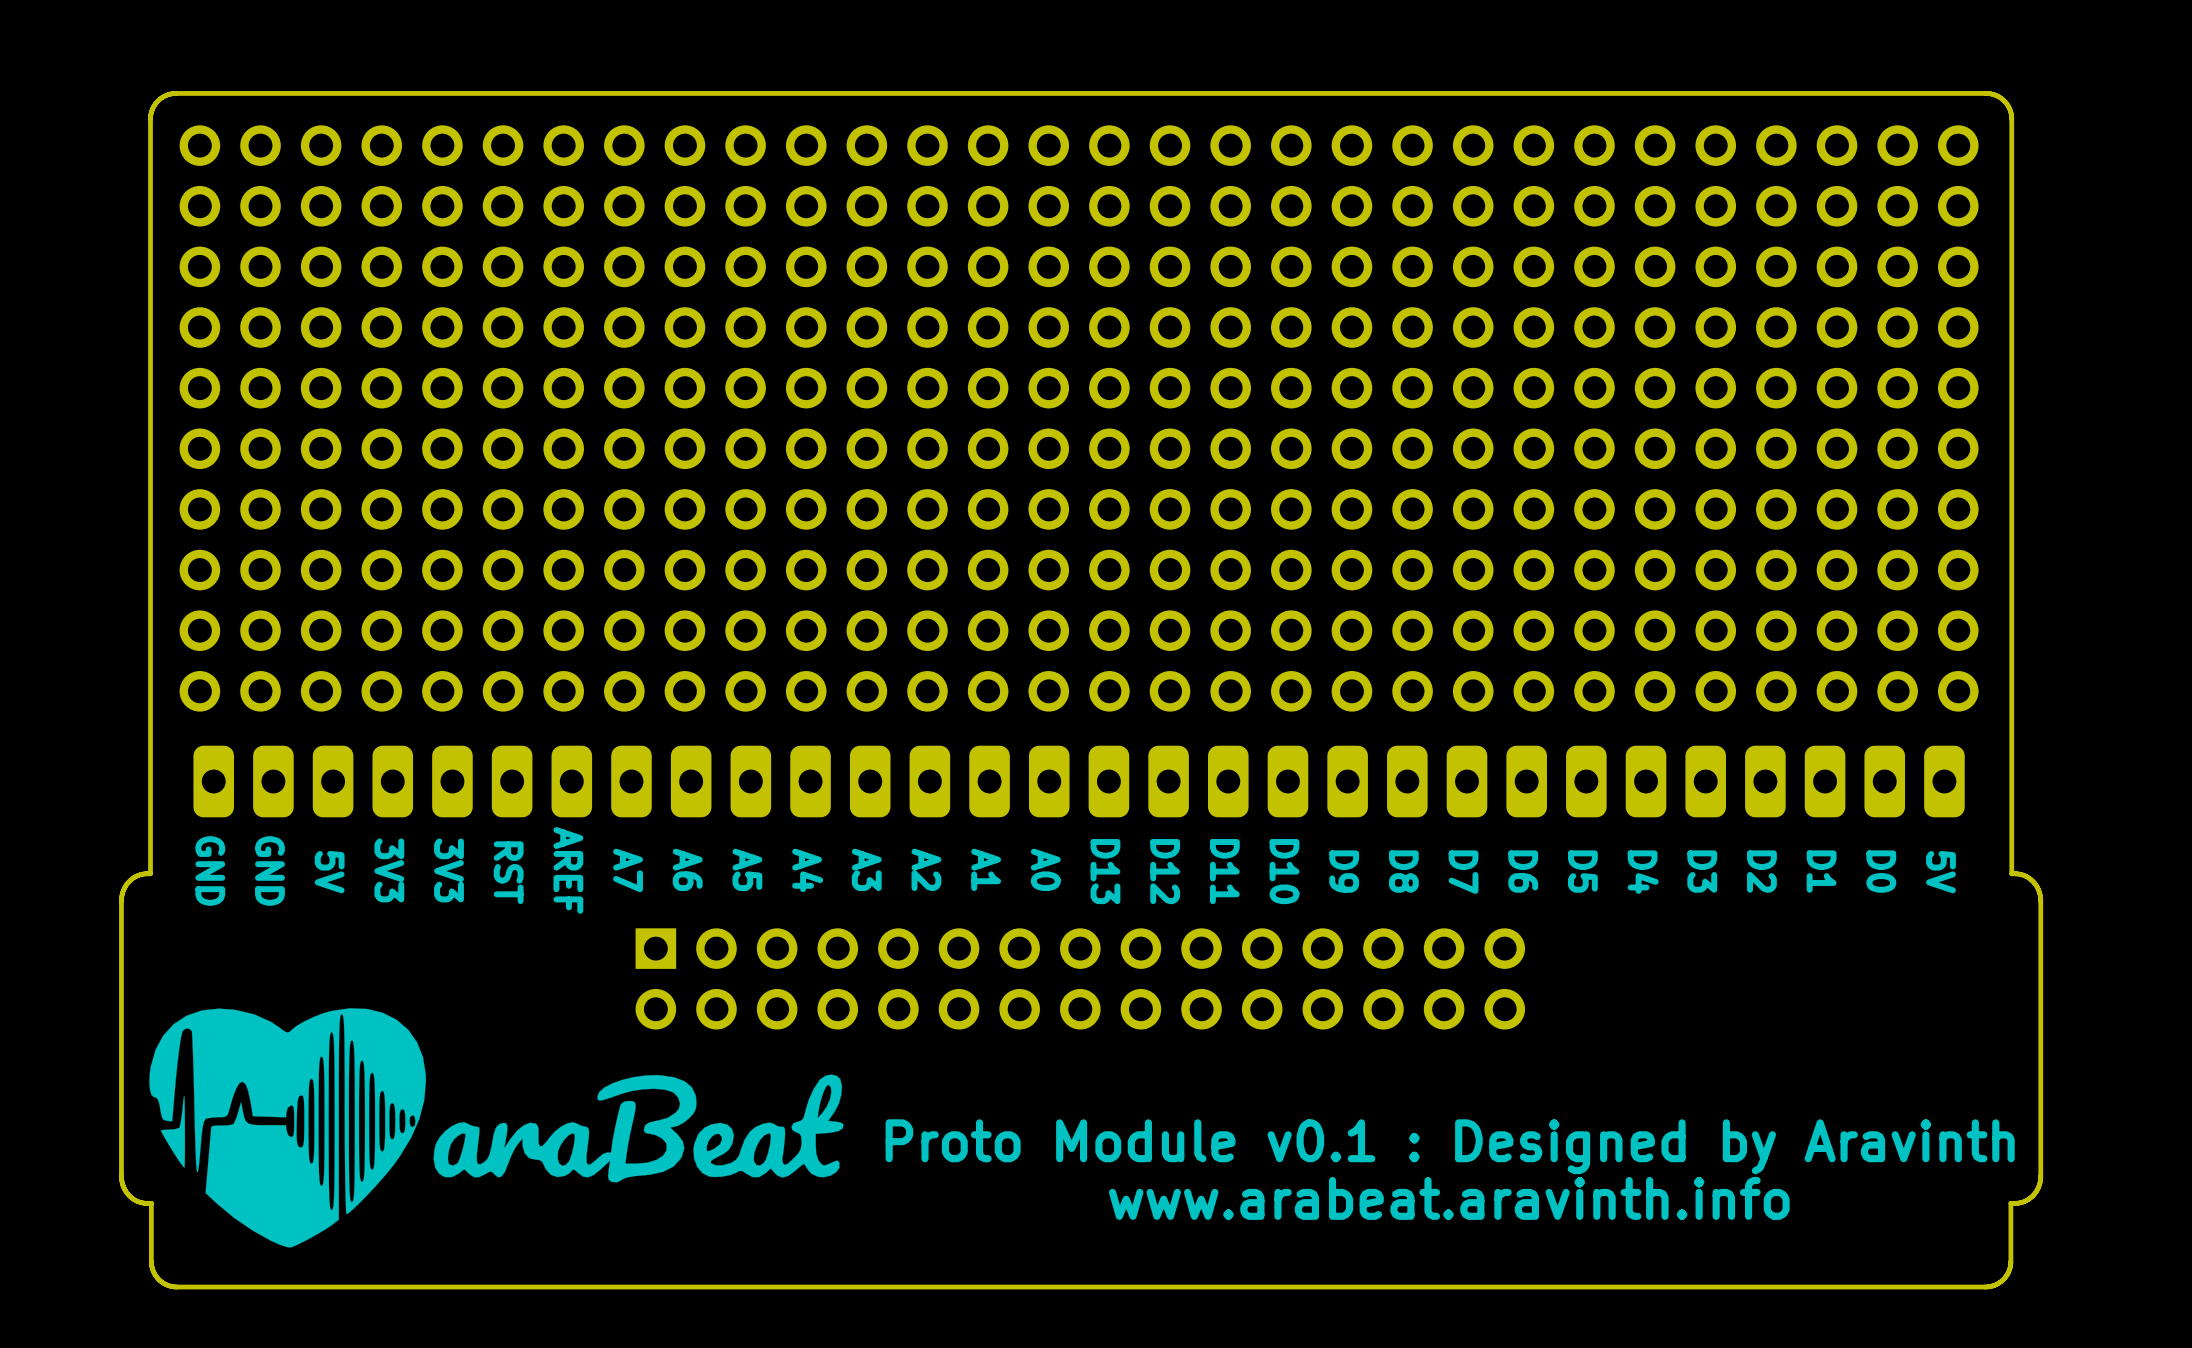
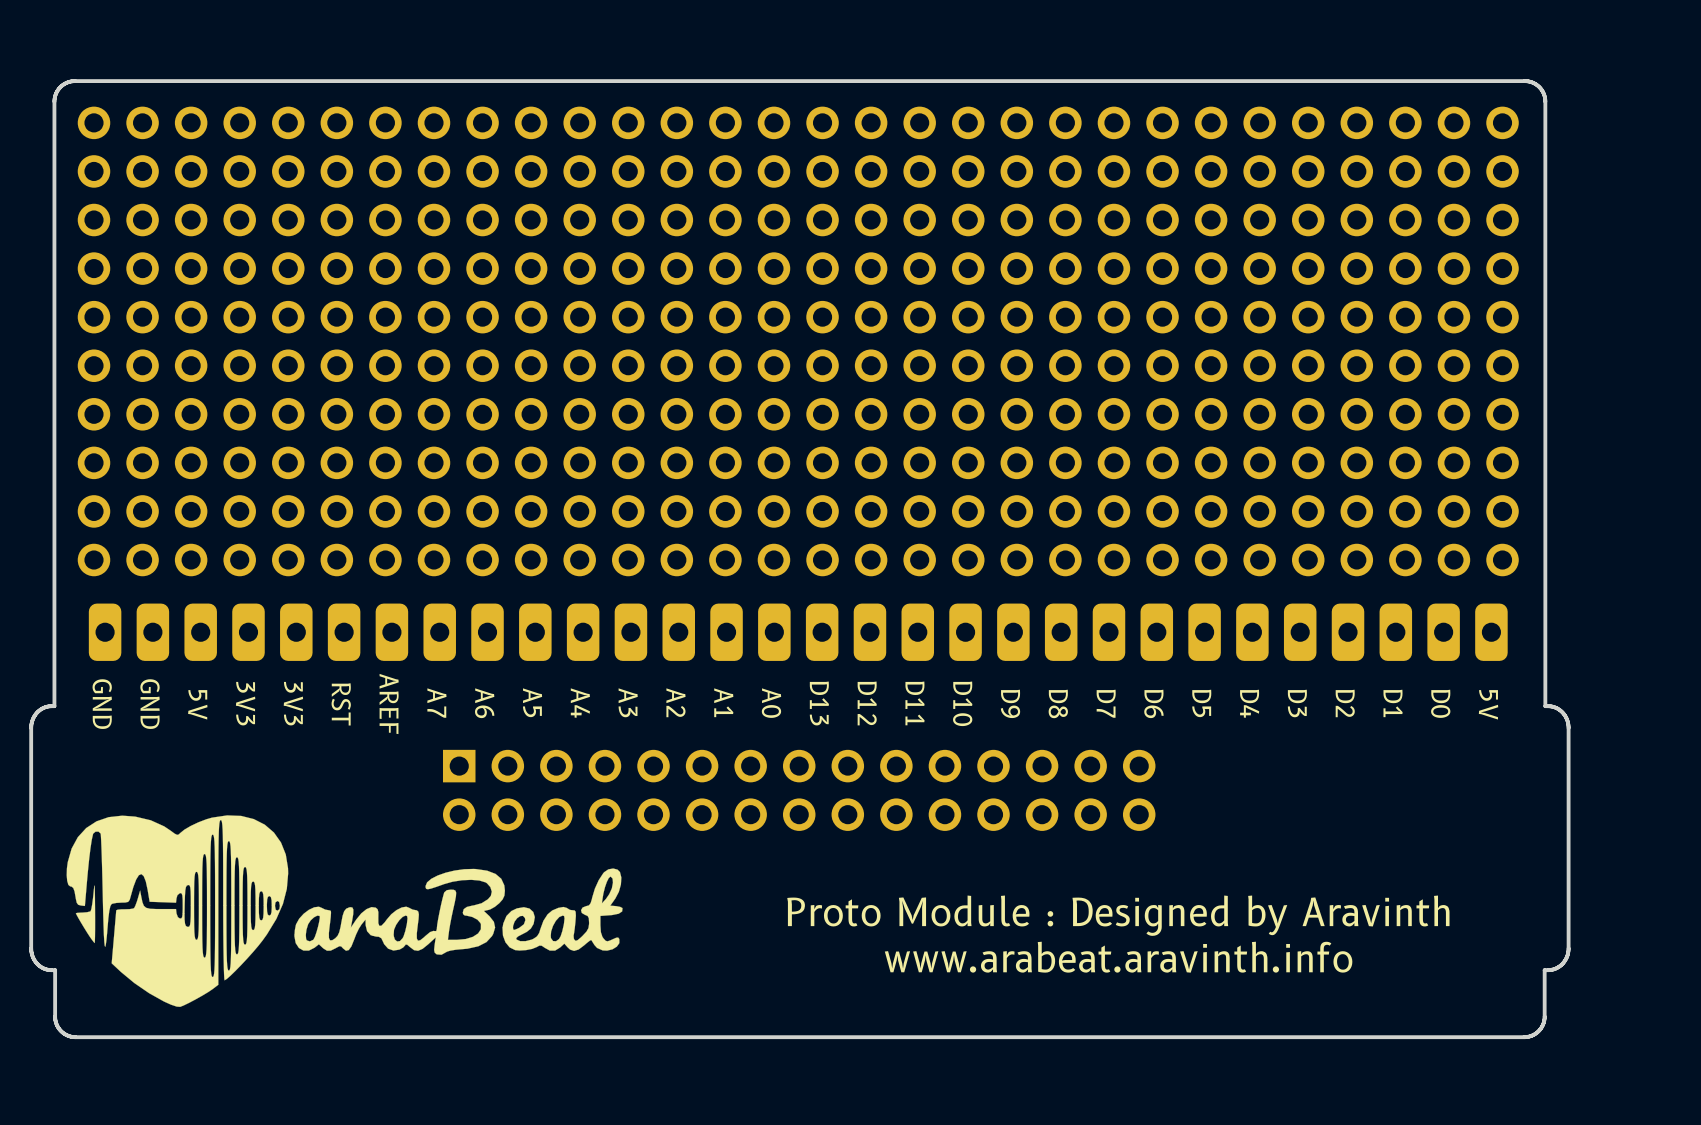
drawing position: (496, 1127) -> (344, 911)
text: Proto Module v0.1 : Designed by Aravinth (1450, 1146) -> Proto Module : Designed by Aravinth (1118, 915)
text position: www.arabeat.aravinth.info (1449, 1198) -> www.arabeat.aravinth.info (1118, 957)

